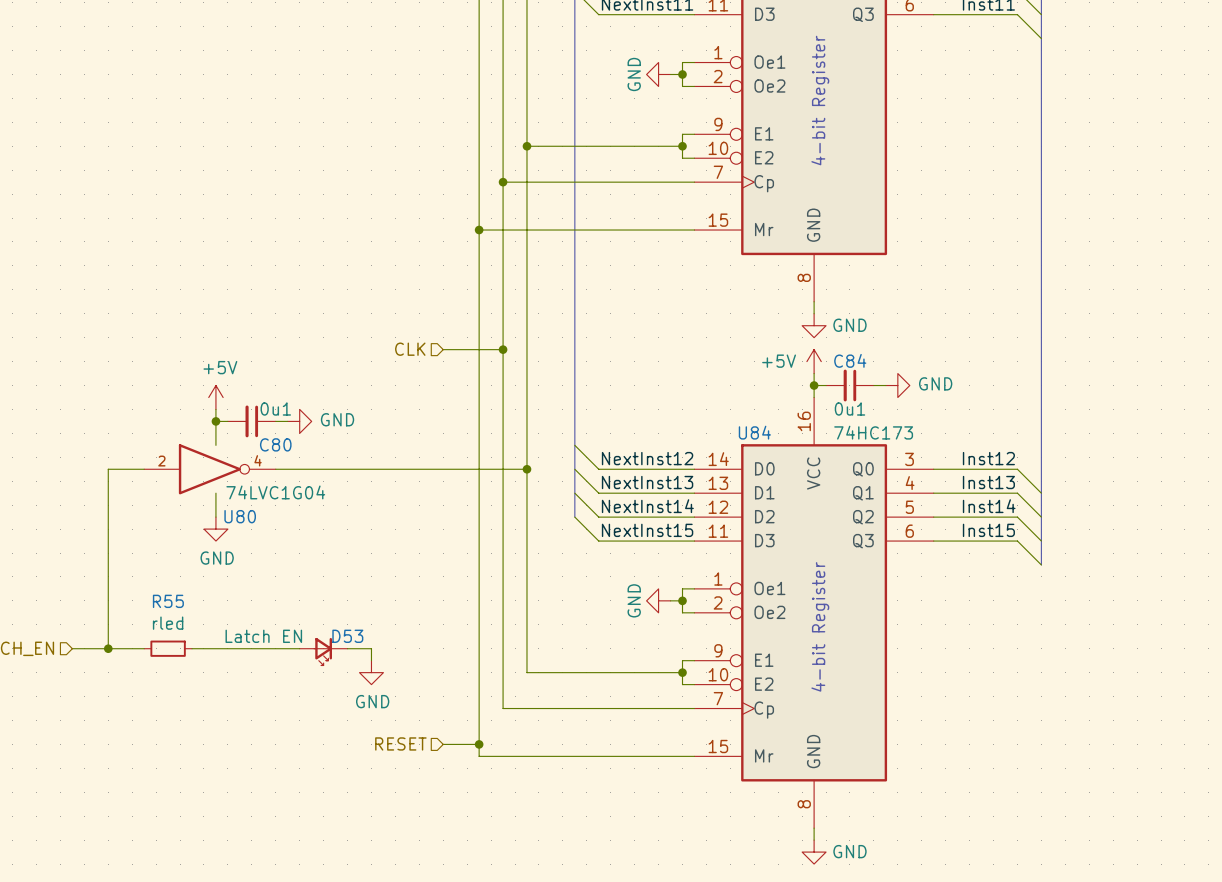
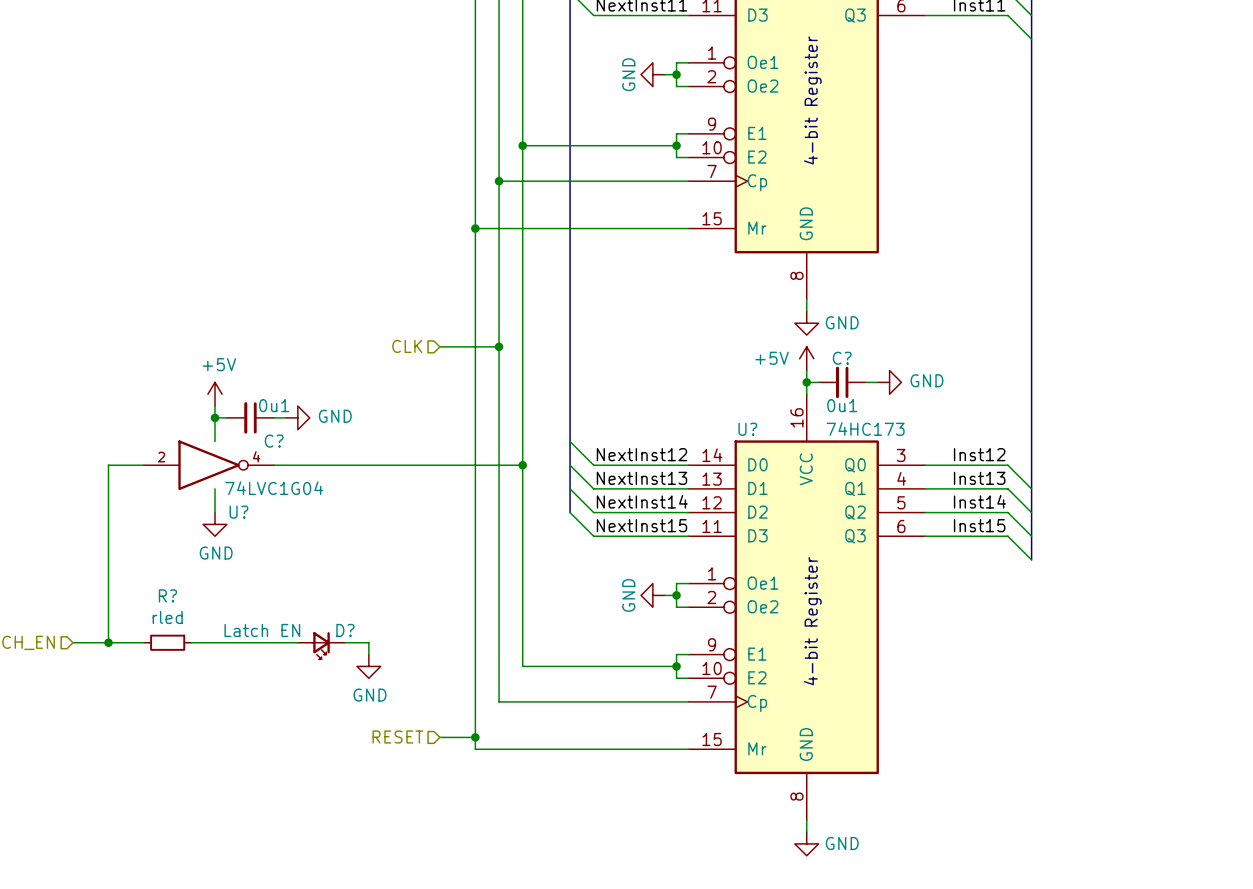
C84 name: C84 (850, 360) -> C? (842, 358)
U84 name: U84 (754, 432) -> U? (747, 429)
C80 name: C80 (275, 444) -> C? (274, 441)
U80 name: U80 (240, 516) -> U? (238, 512)
R55 name: R55 (168, 601) -> R? (167, 595)
D53 name: D53 (347, 636) -> D? (345, 630)

